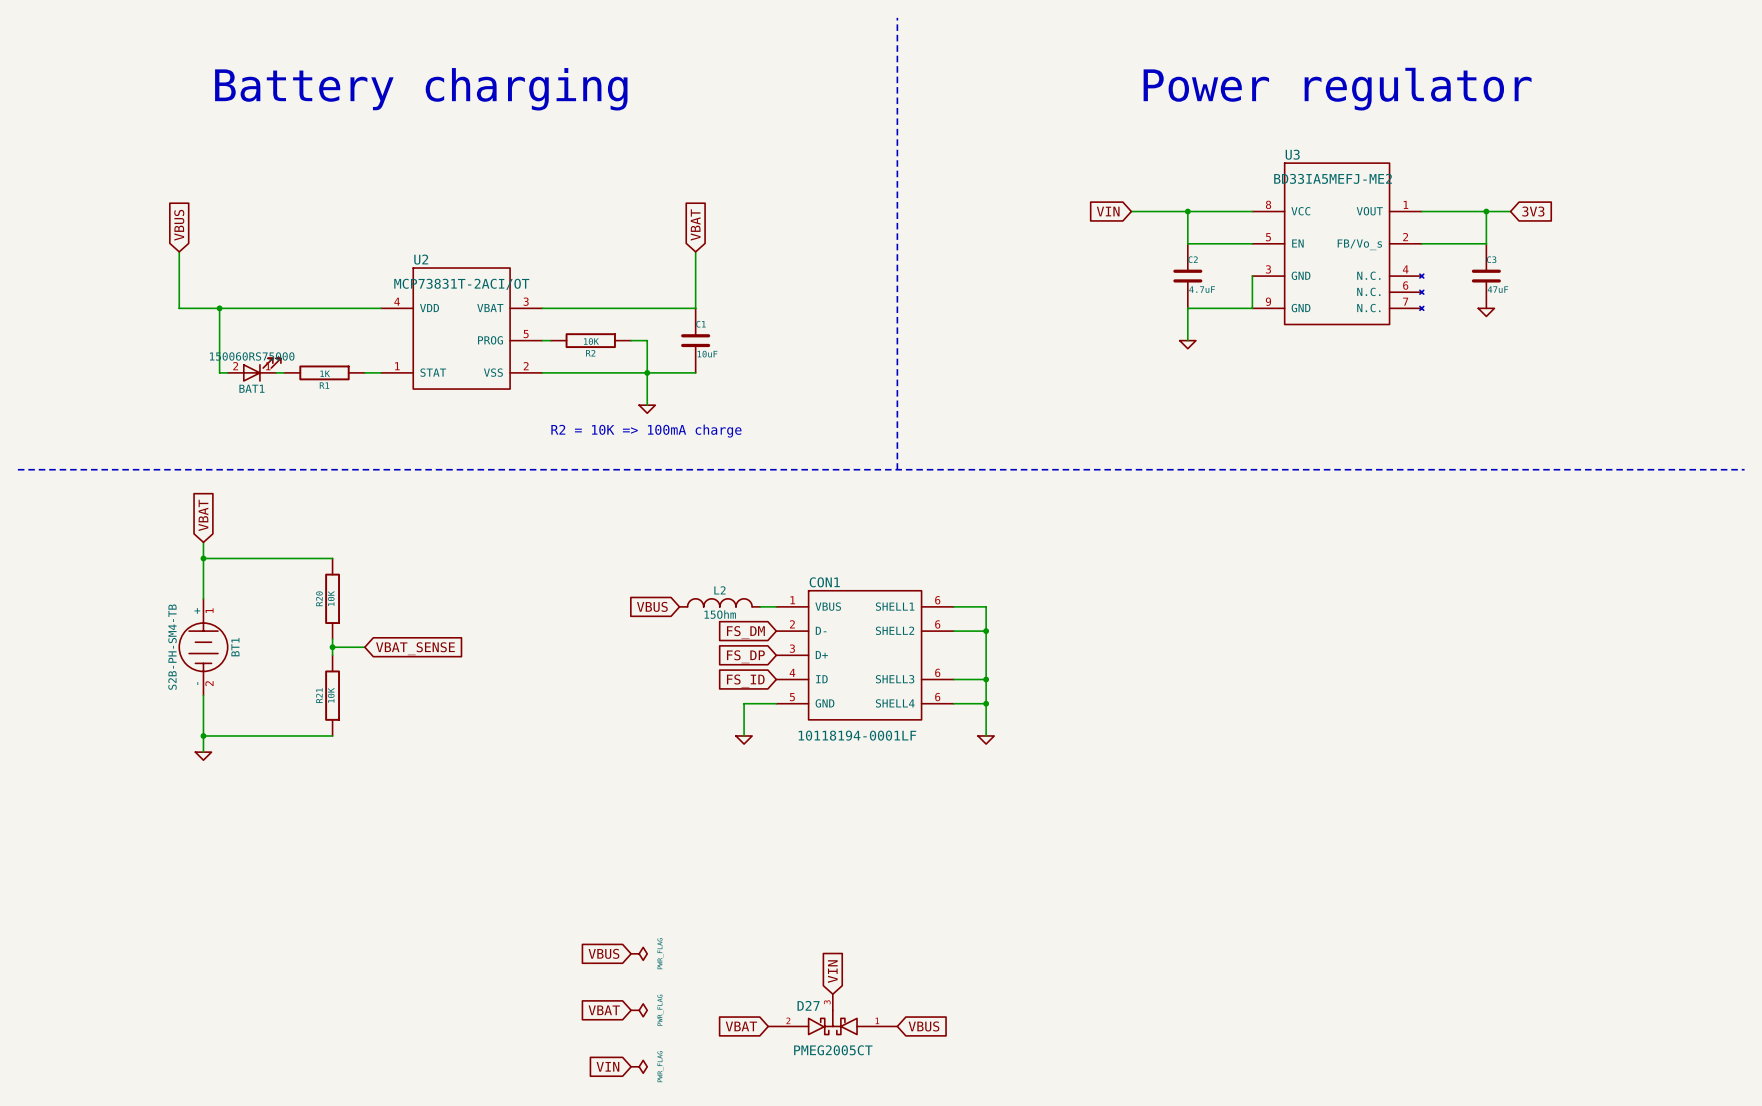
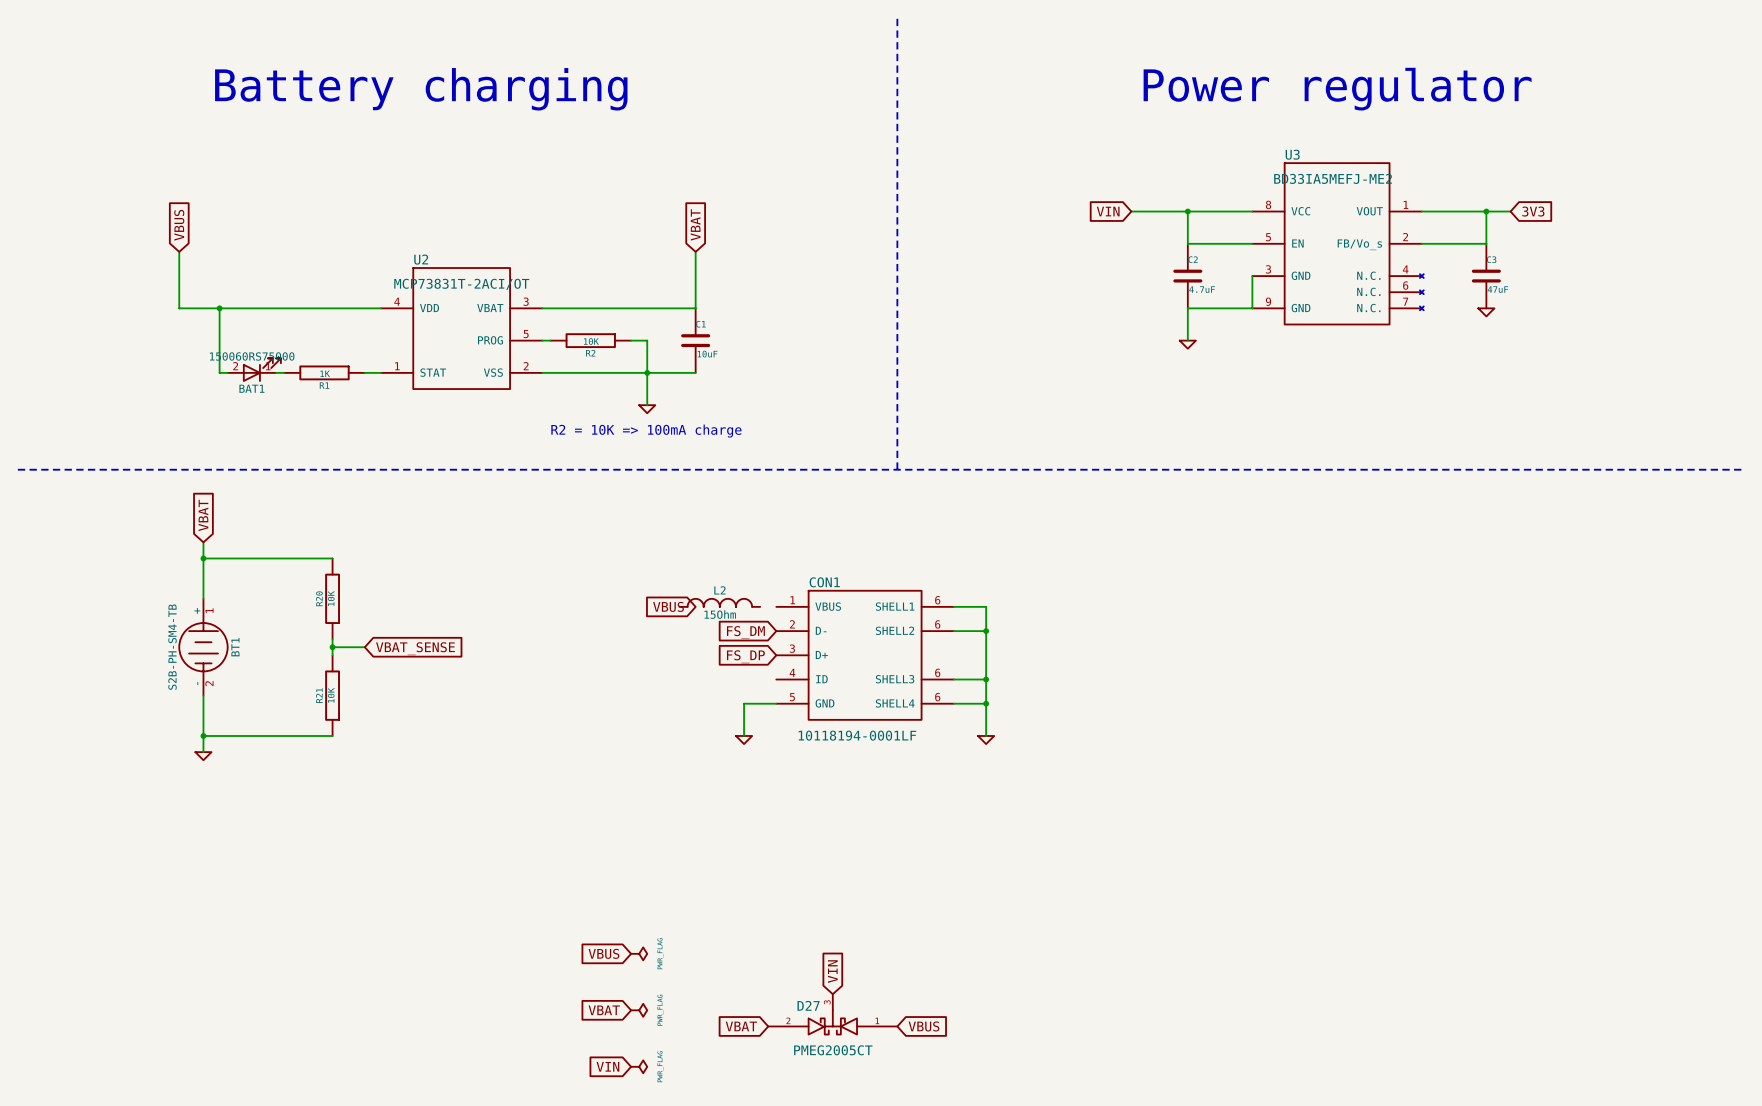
global label position: VBUS (652, 606) -> VBUS (668, 606)
wire: (760, 606) (776, 606) -> none
global label: FS_ID (745, 680) -> none

